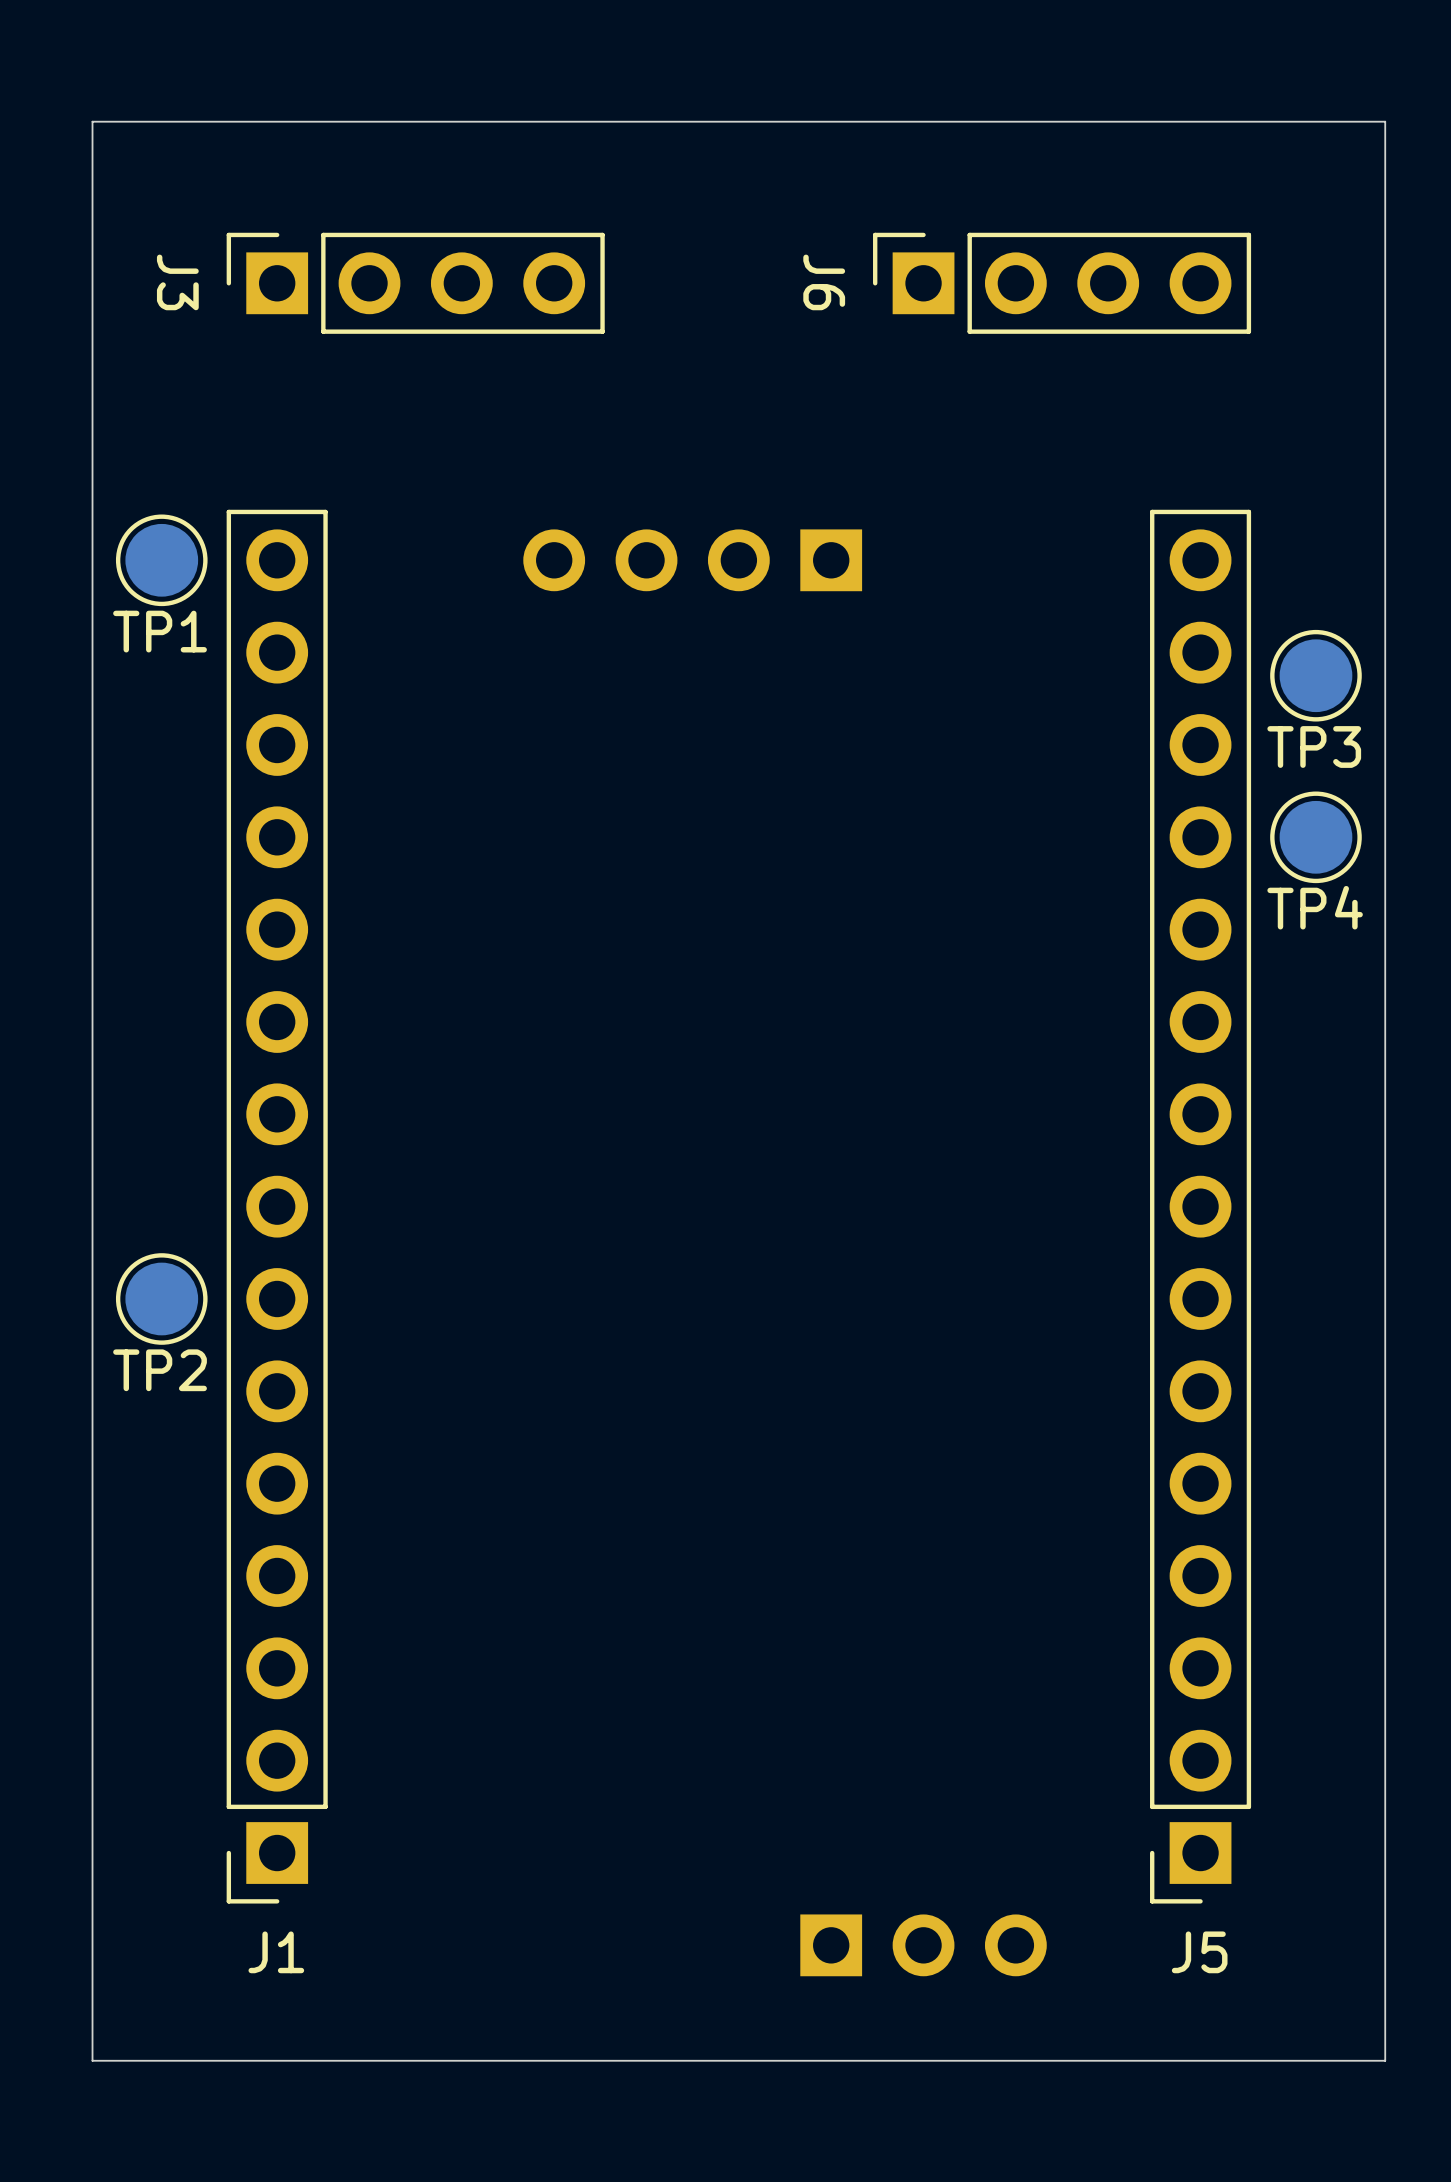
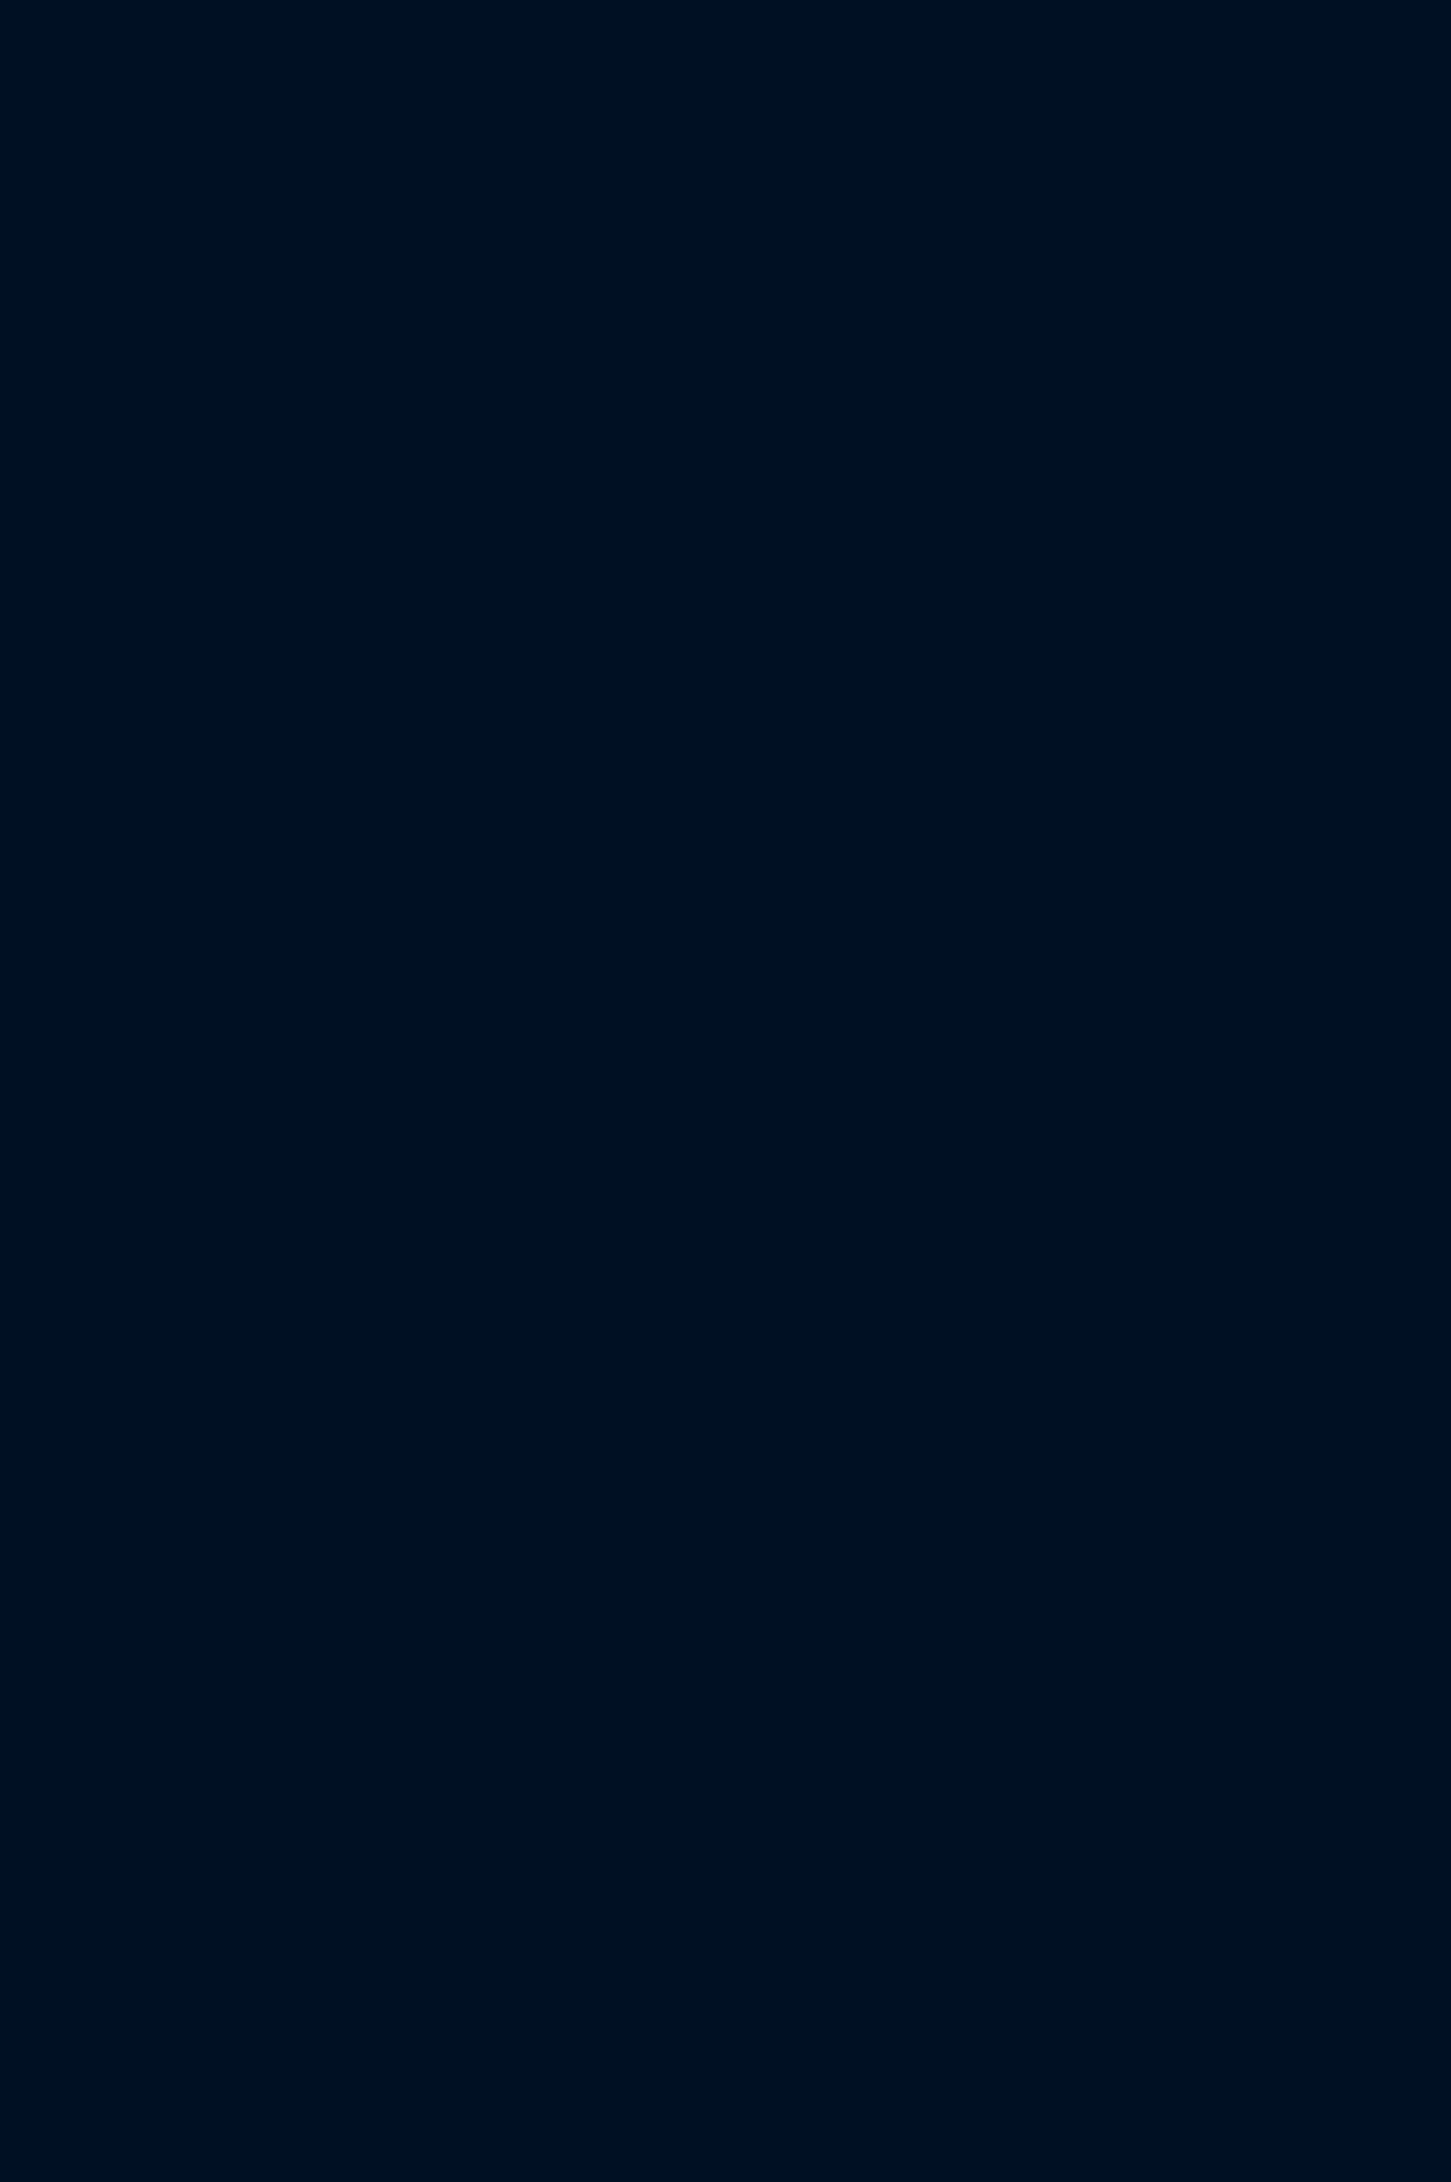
board edge: (1385, 121) (92, 121) (92, 2060) (1385, 2060) (1385, 121) -> none
J3: (415, 283) -> none
J6: (1062, 283) -> none
TP1: (161, 560) -> none
part: (692, 560) -> none
TP3: (1315, 675) -> none
TP4: (1315, 837) -> none
J1: (277, 1206) -> none
J5: (1200, 1206) -> none
TP2: (161, 1298) -> none
part: (923, 1945) -> none

